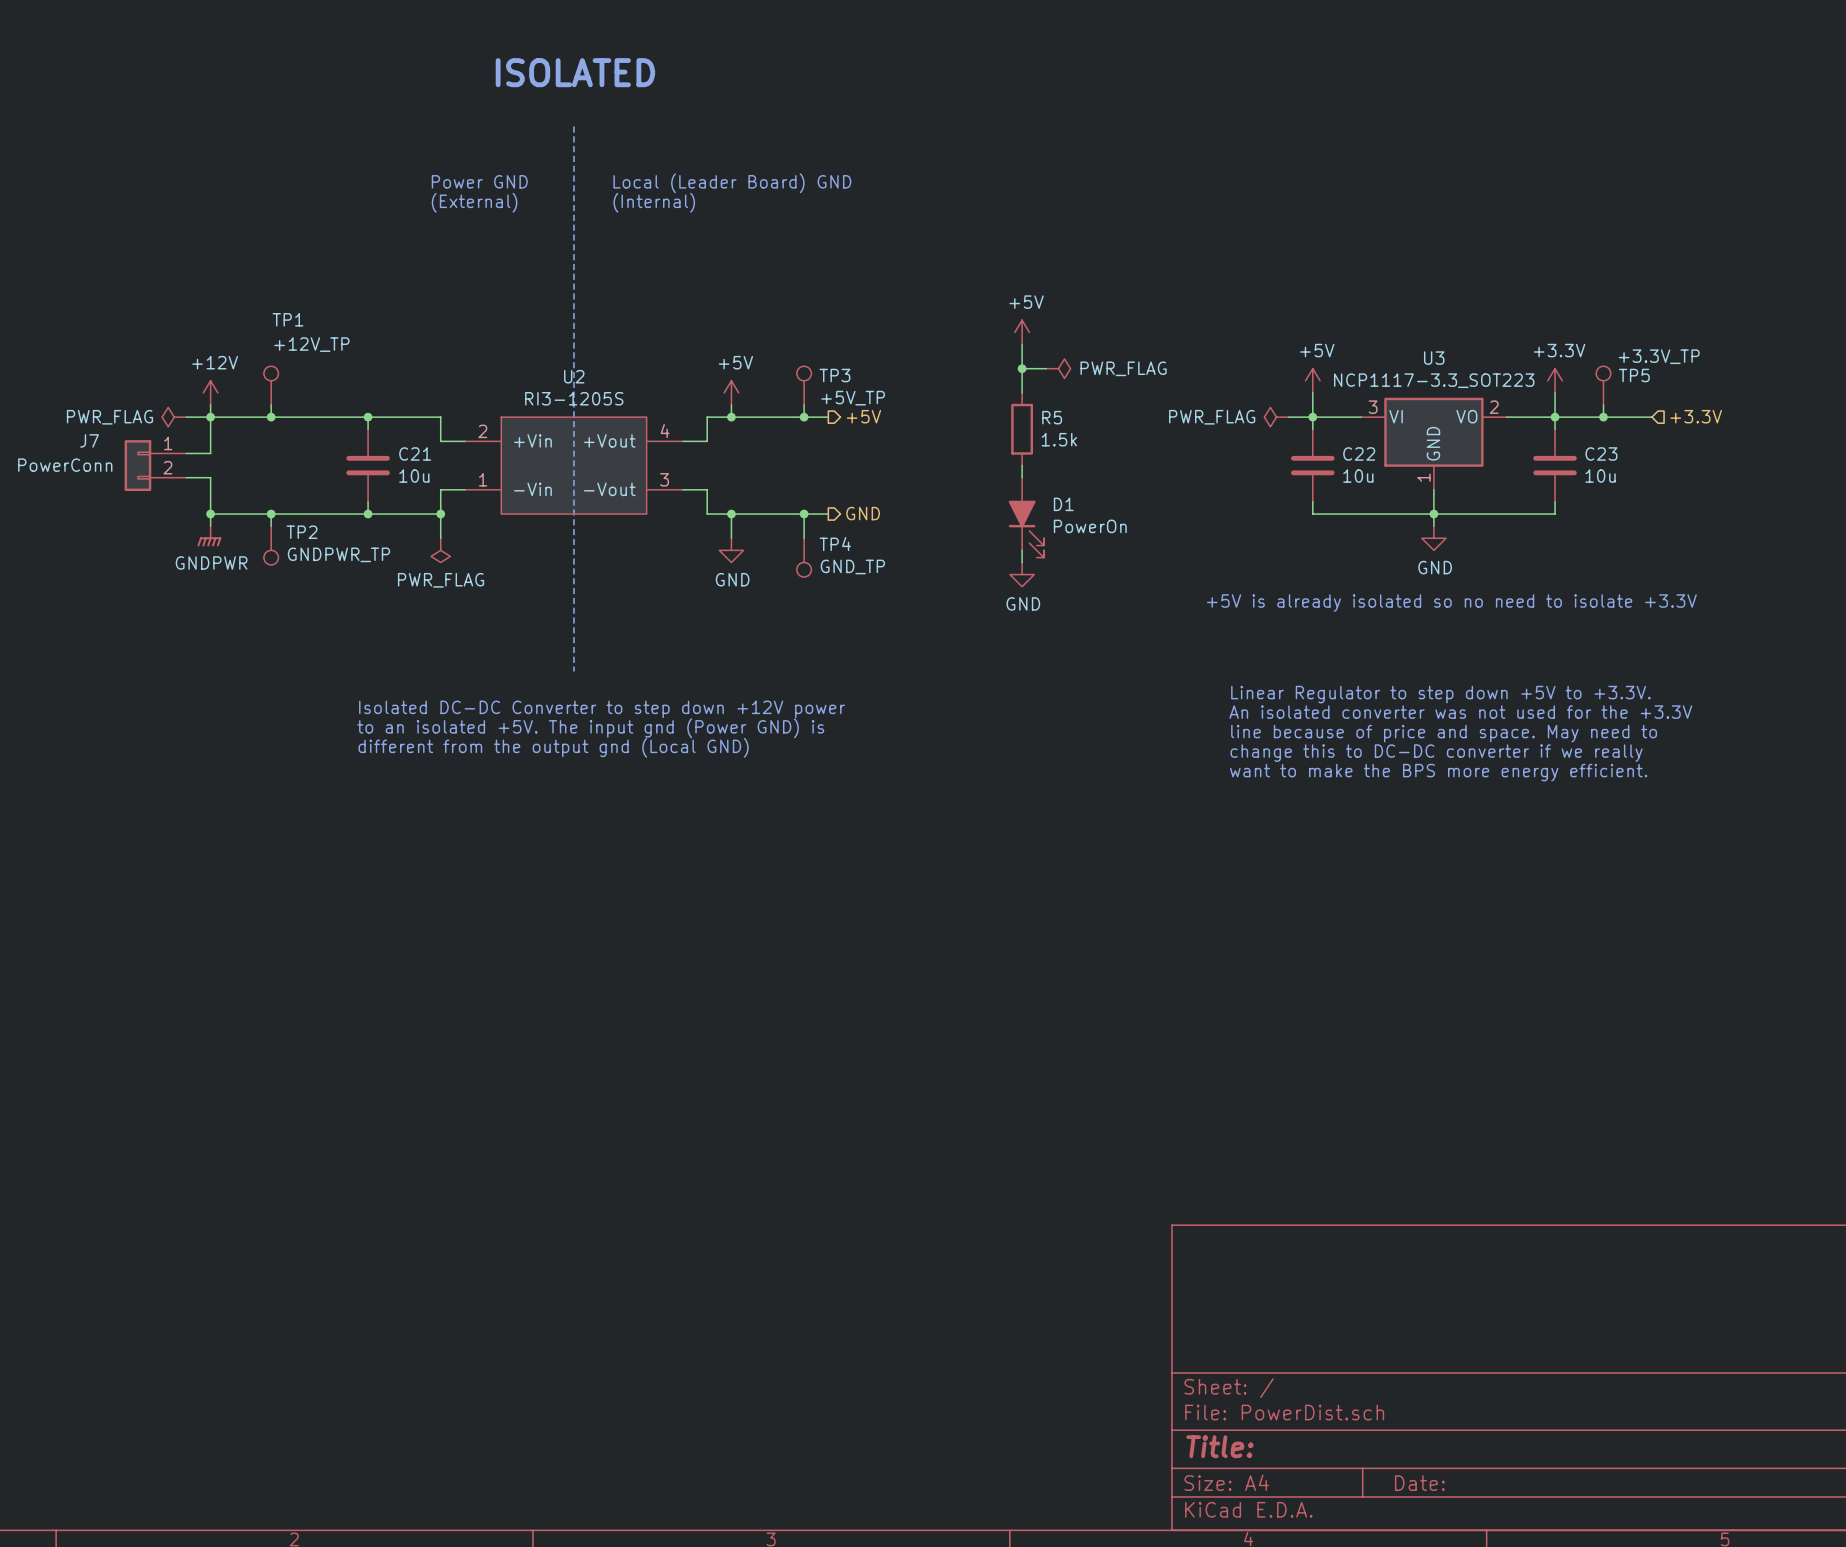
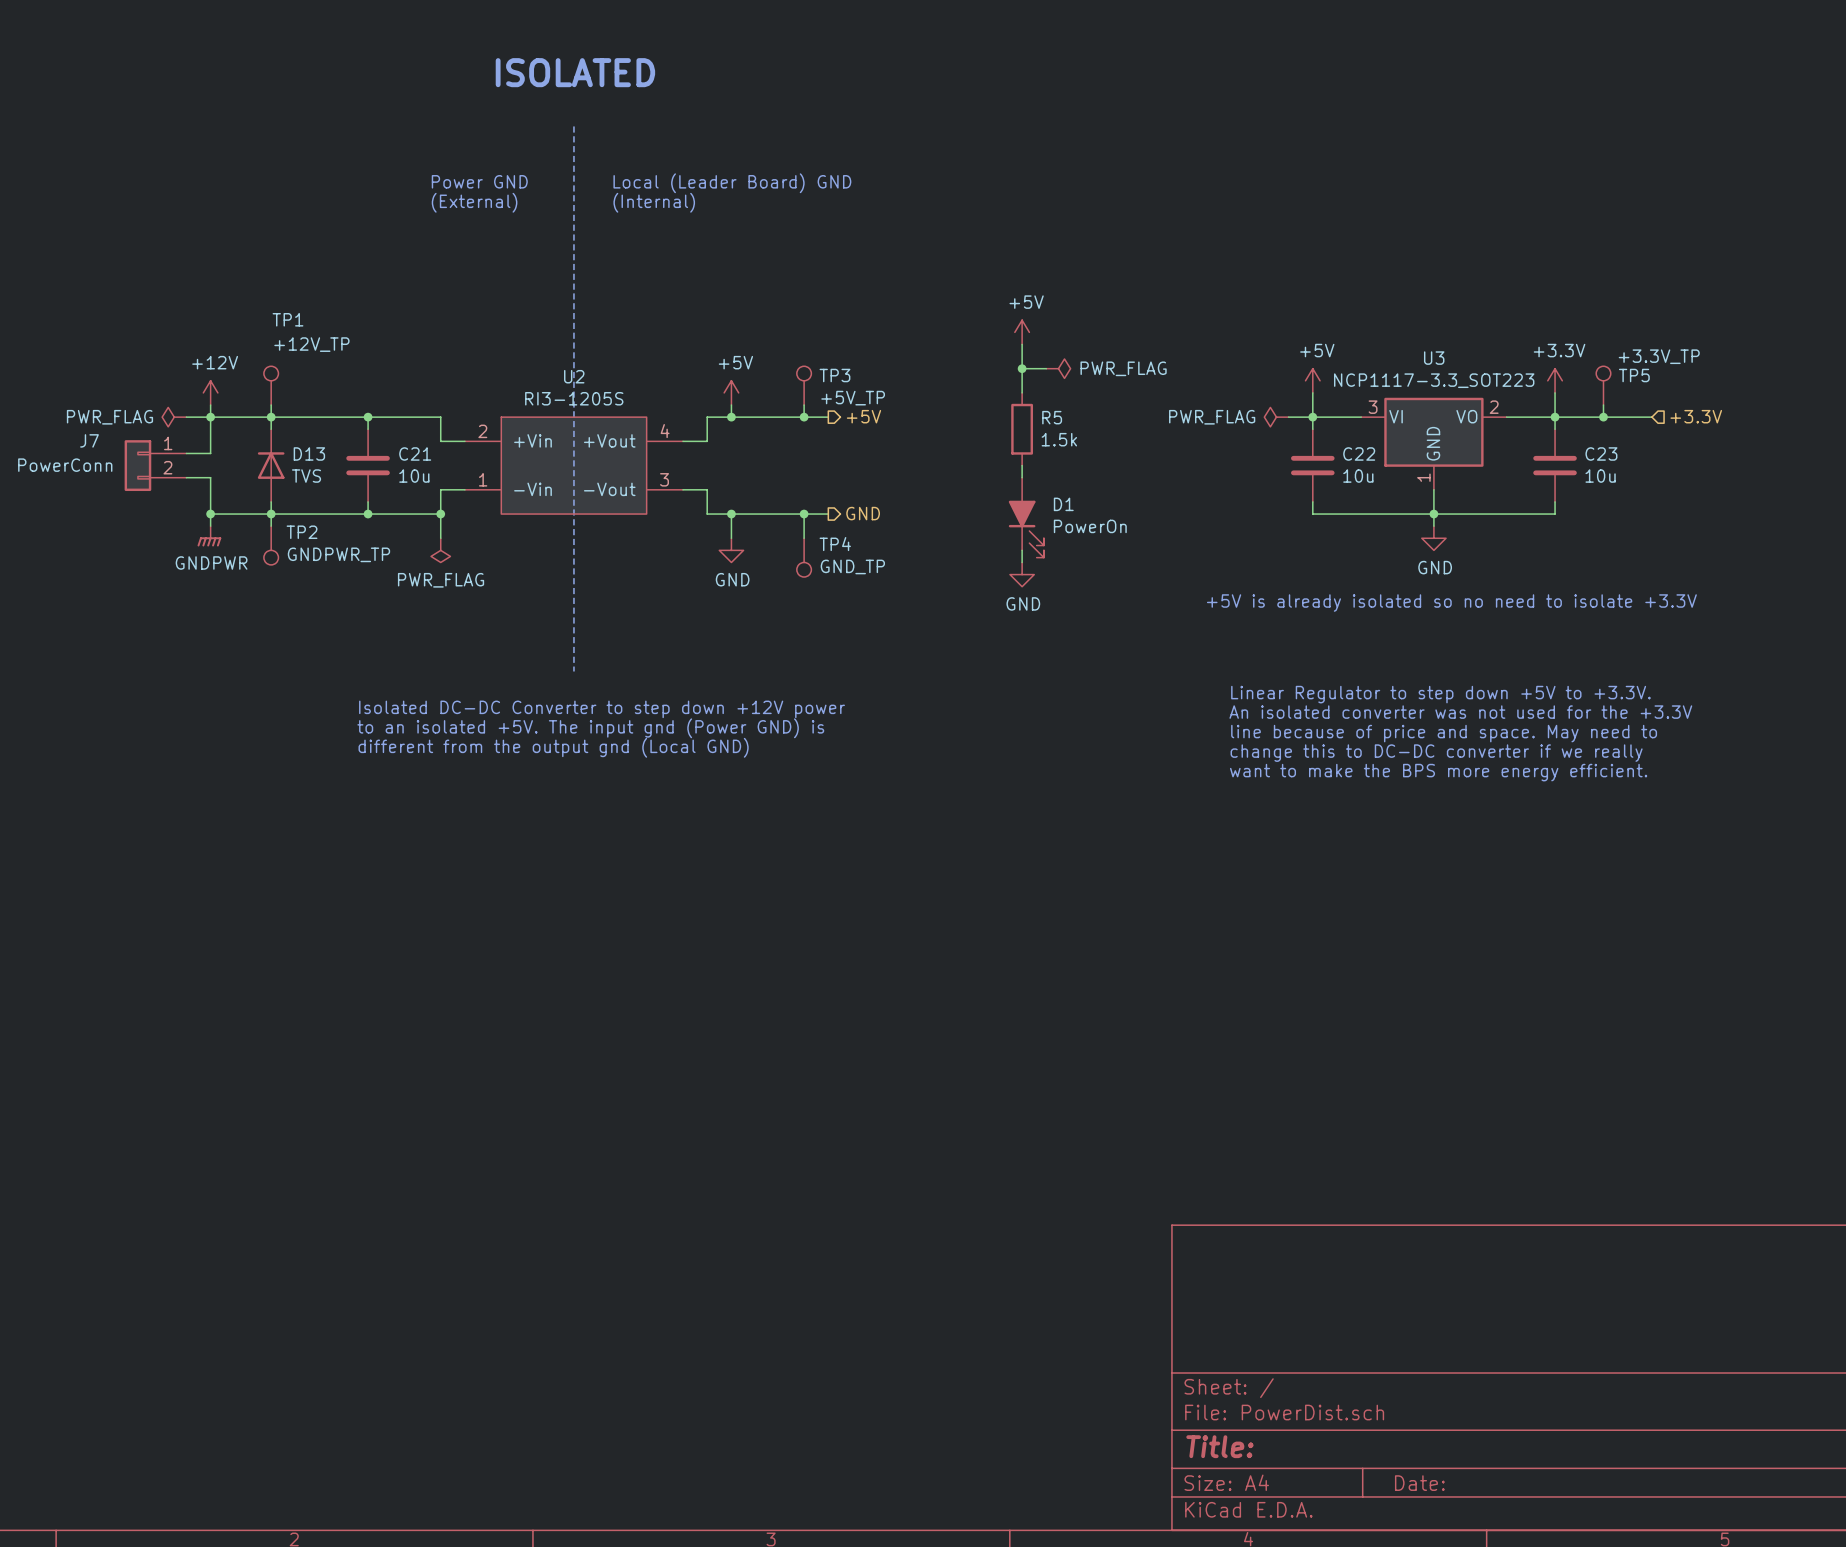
wire: none -> (271, 417) (271, 429)
D13: none -> TVS (271, 465)
wire: none -> (271, 501) (271, 514)

